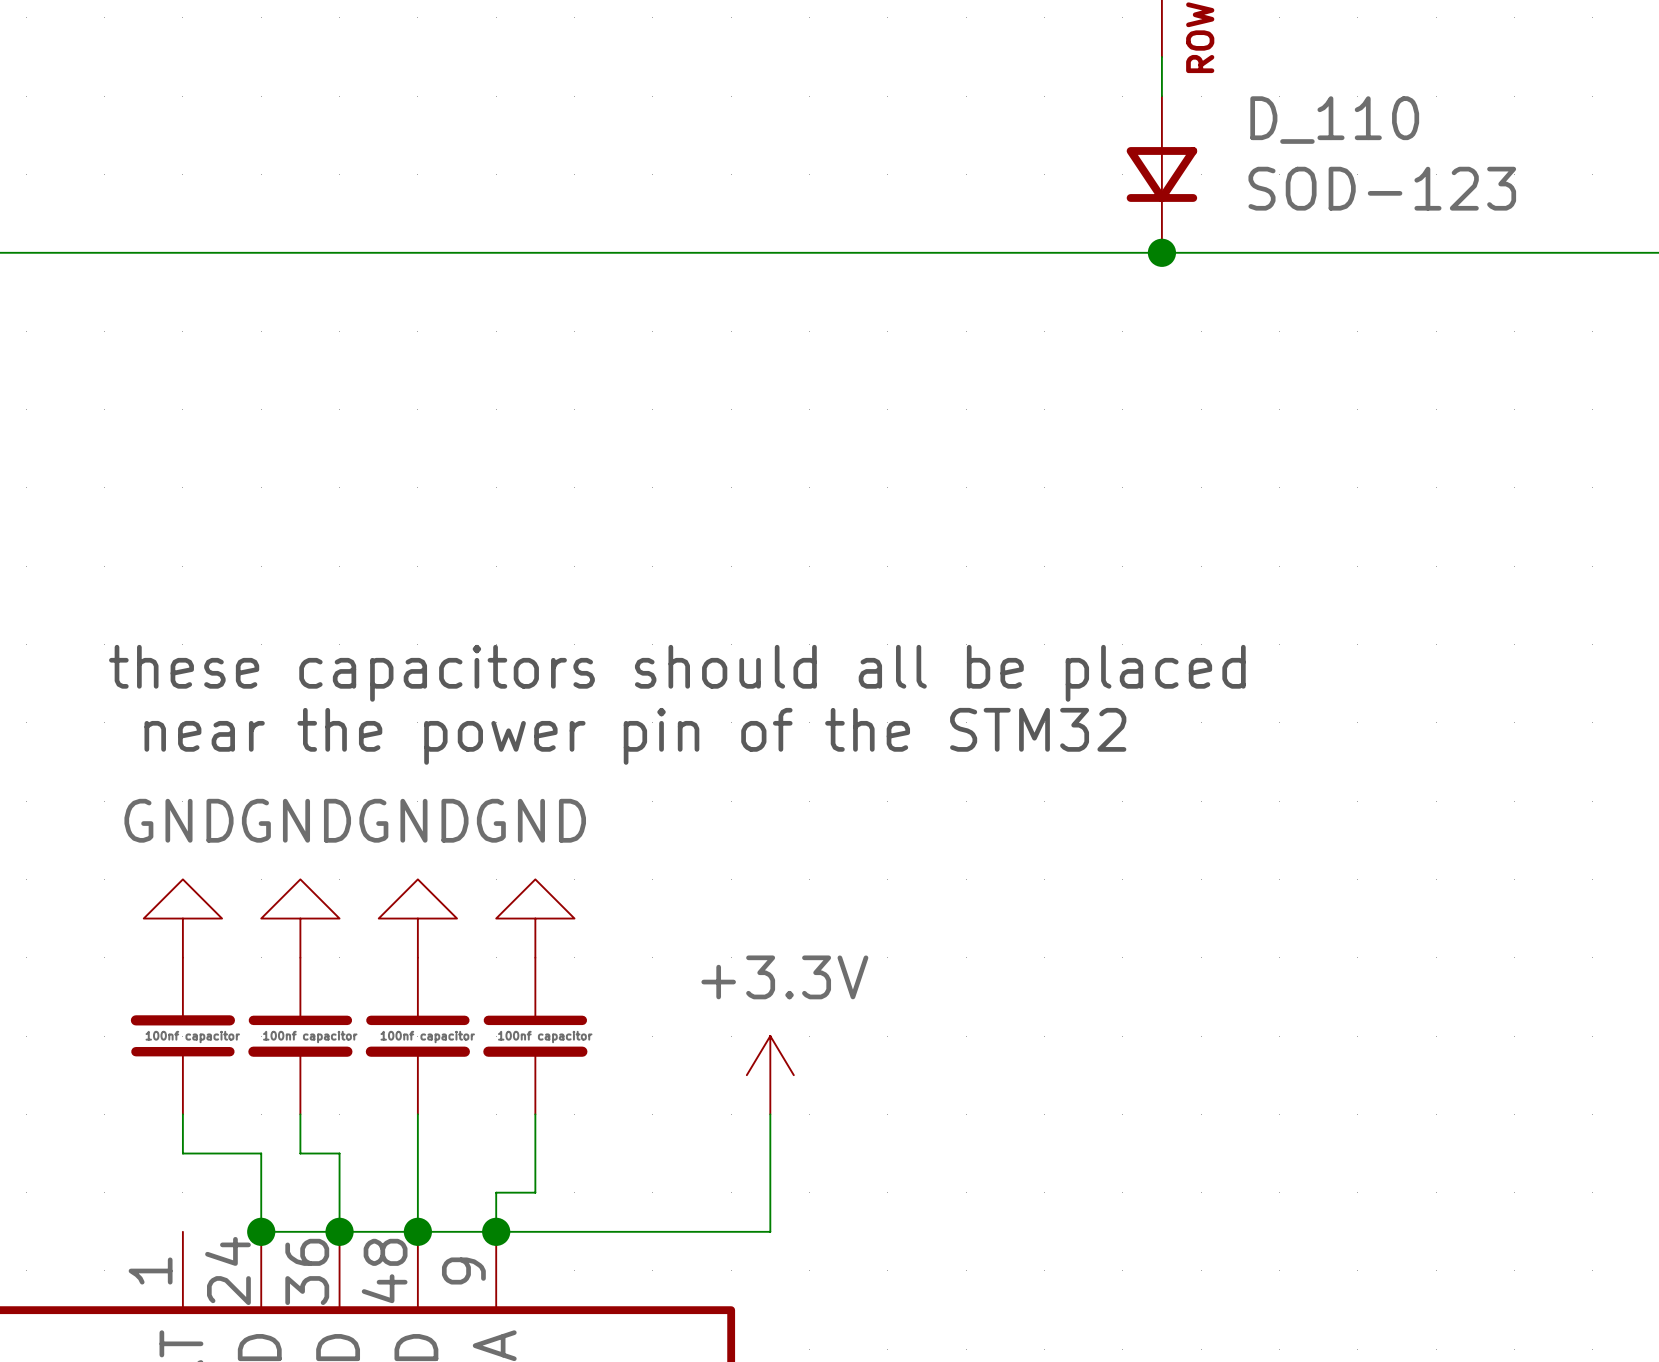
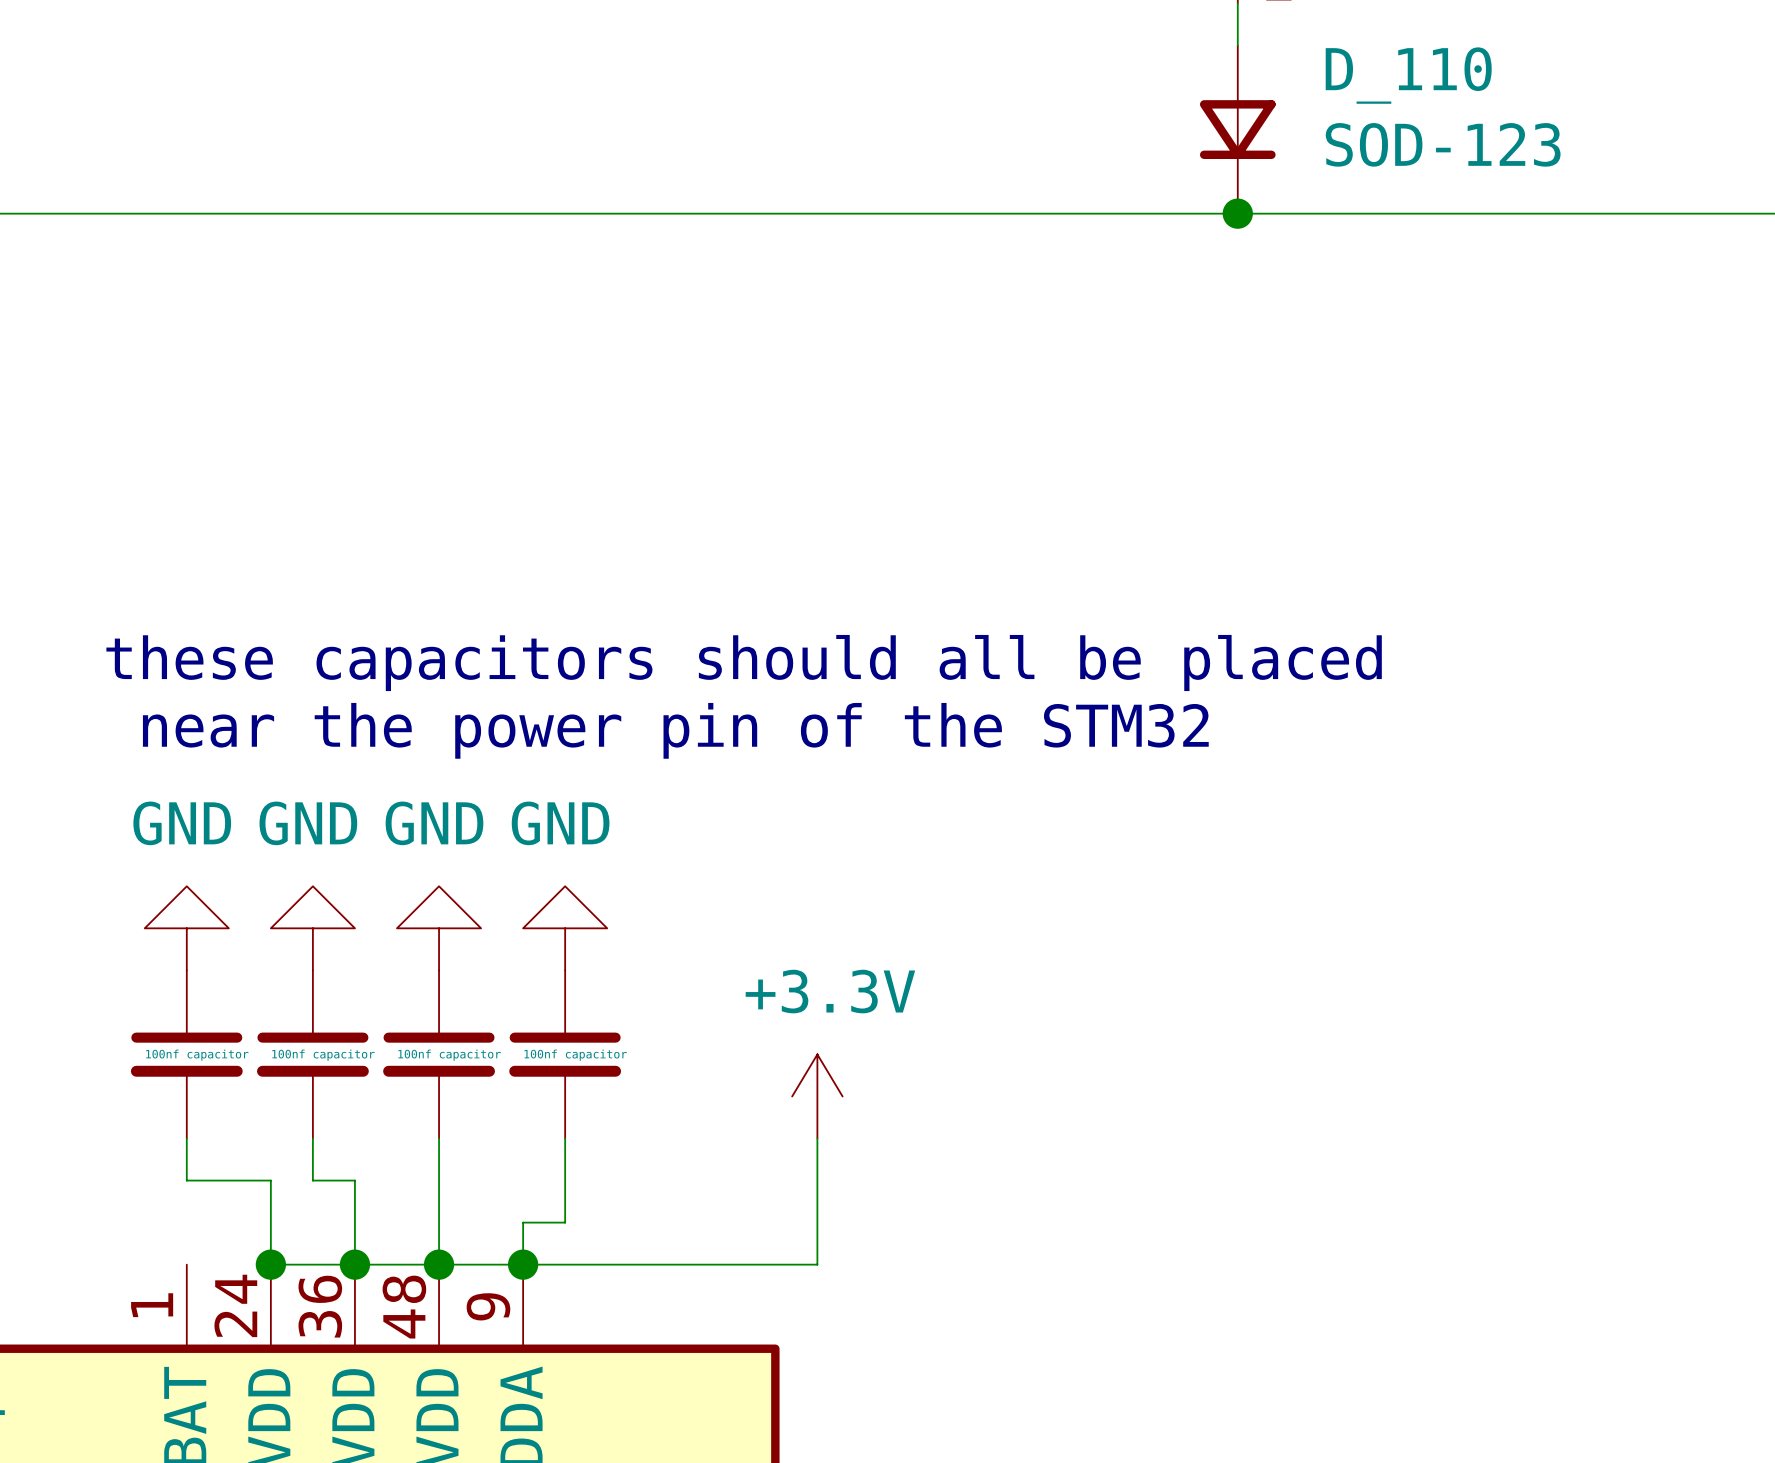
part rotation: 0° (182, 1035) -> 180° (186, 1054)

